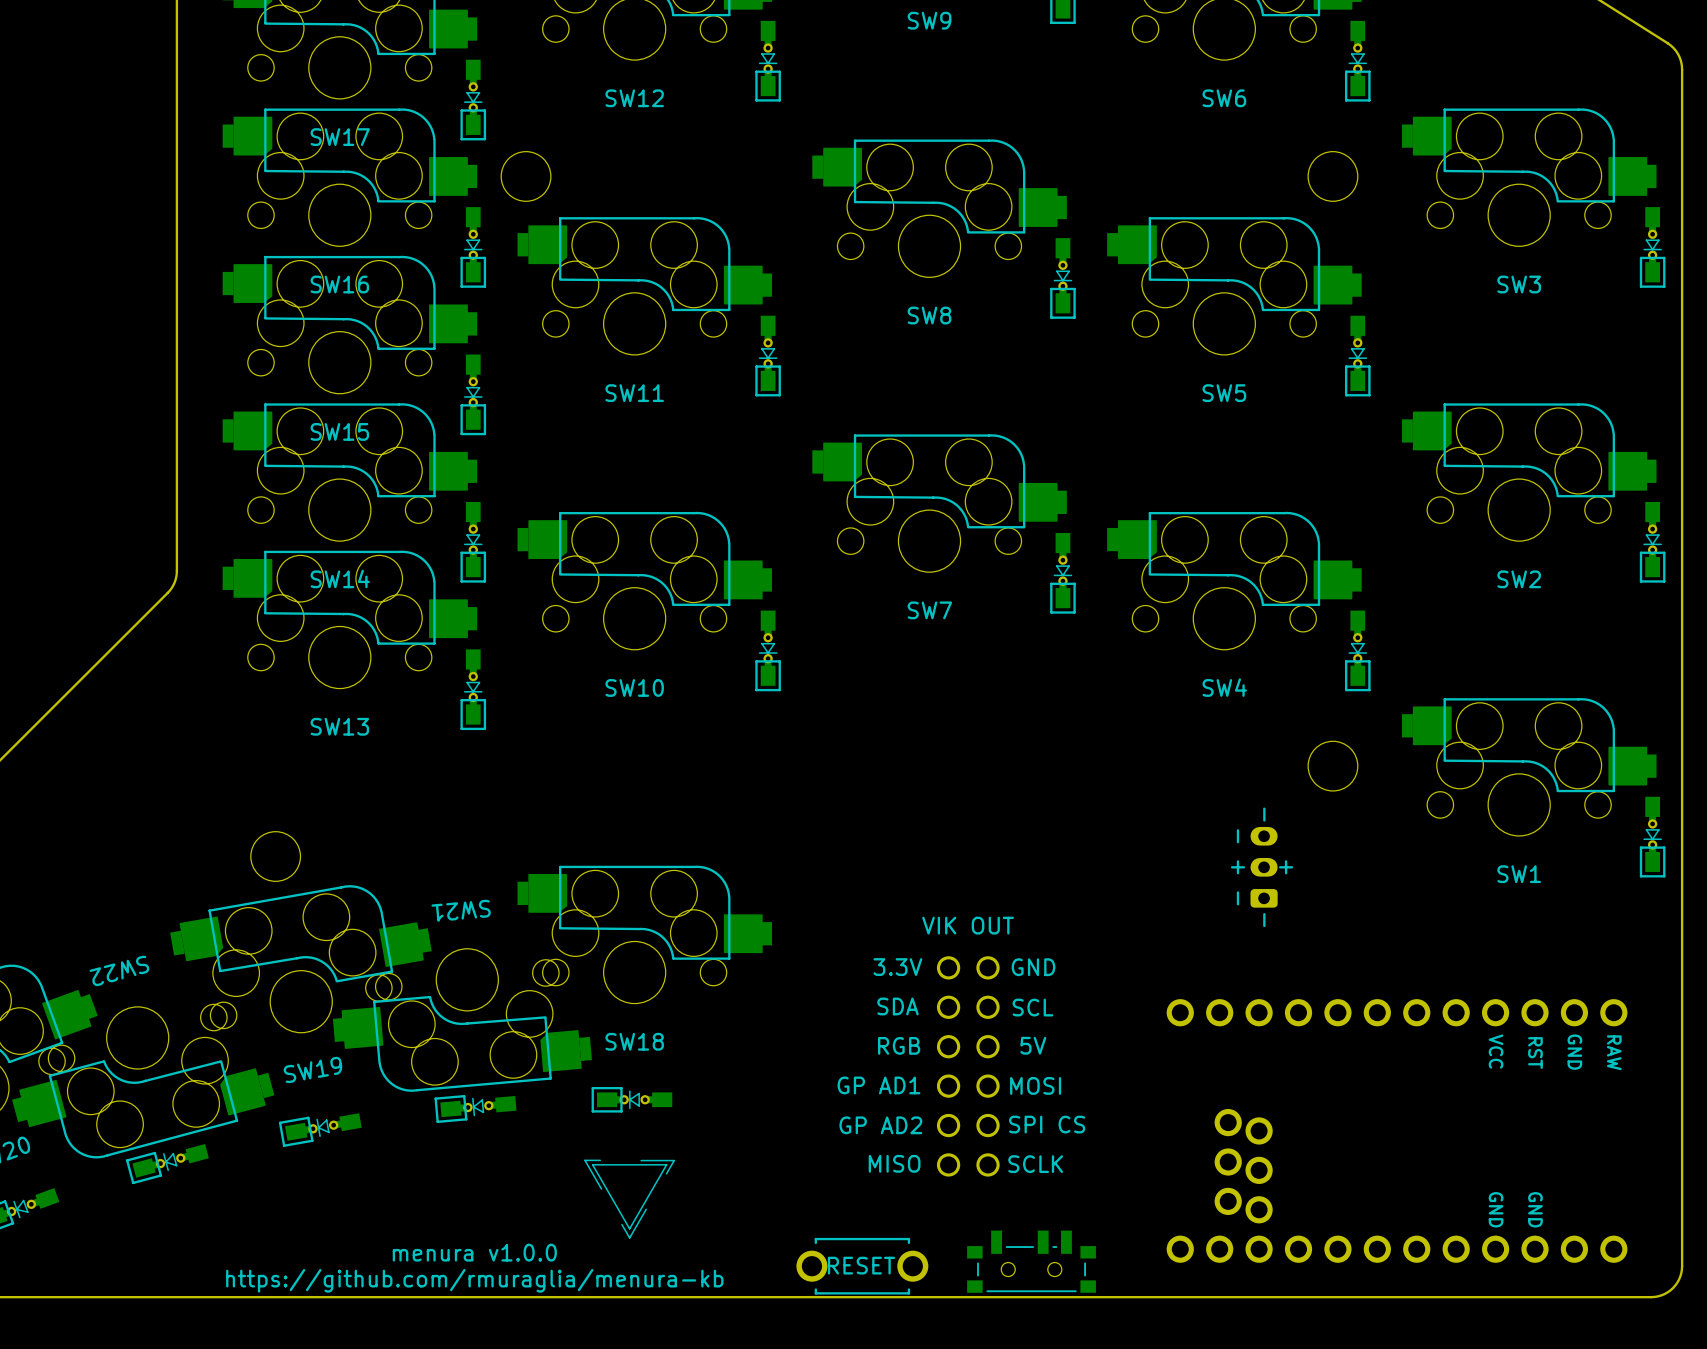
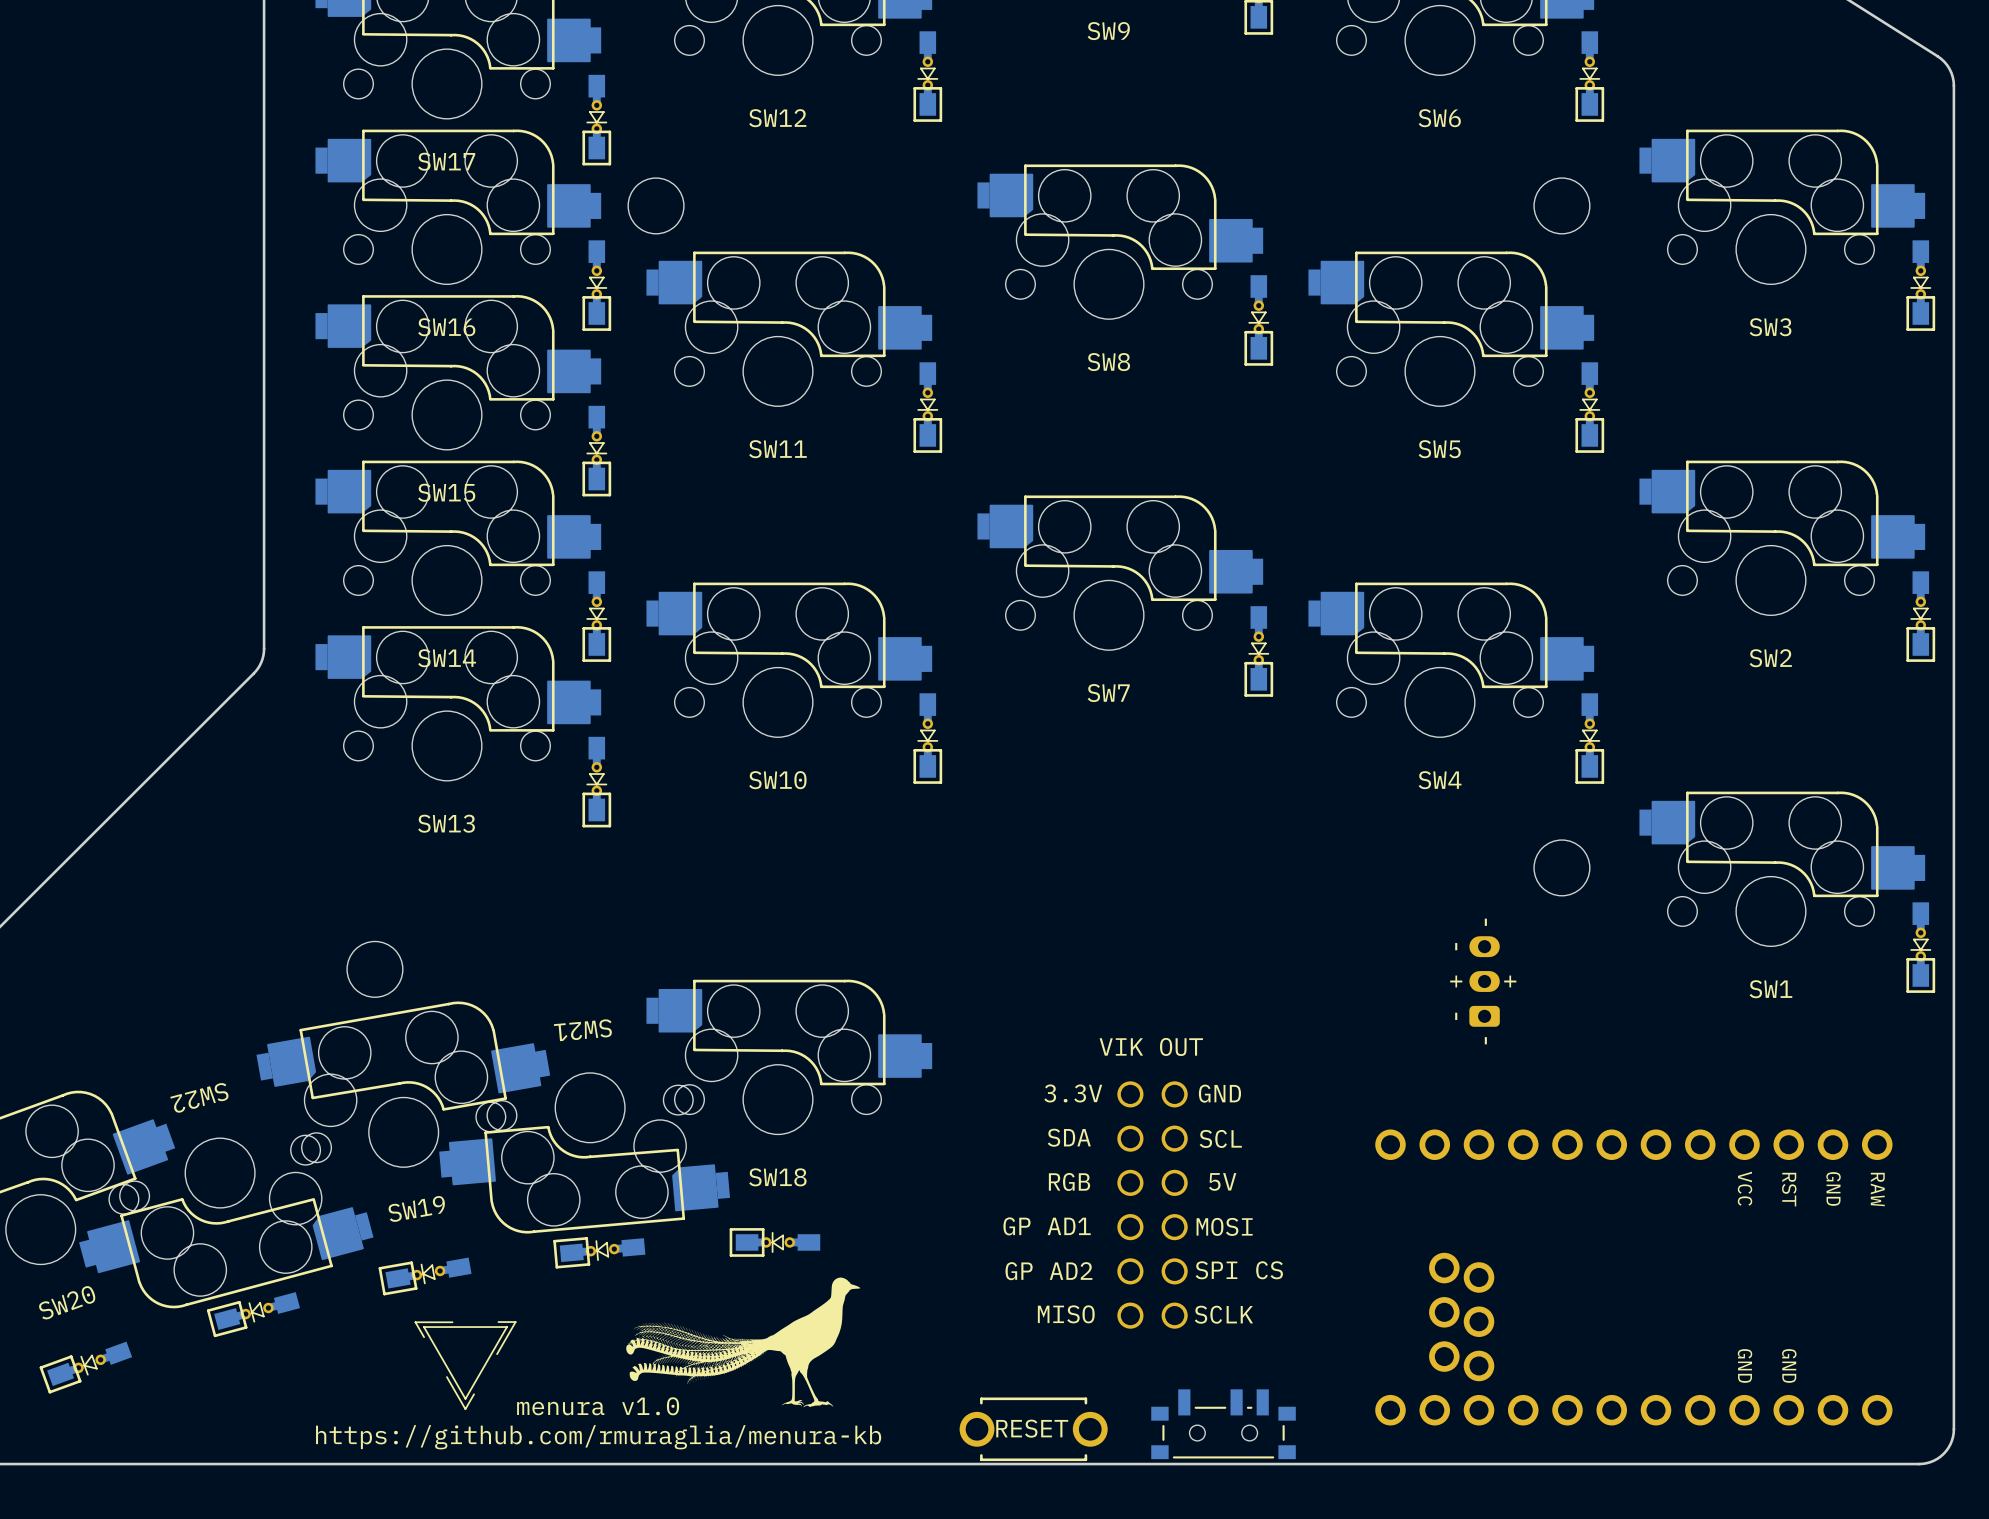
drawing: none -> [414, 1277, 861, 1411]
drawing: [584, 1159, 675, 1239] -> none

